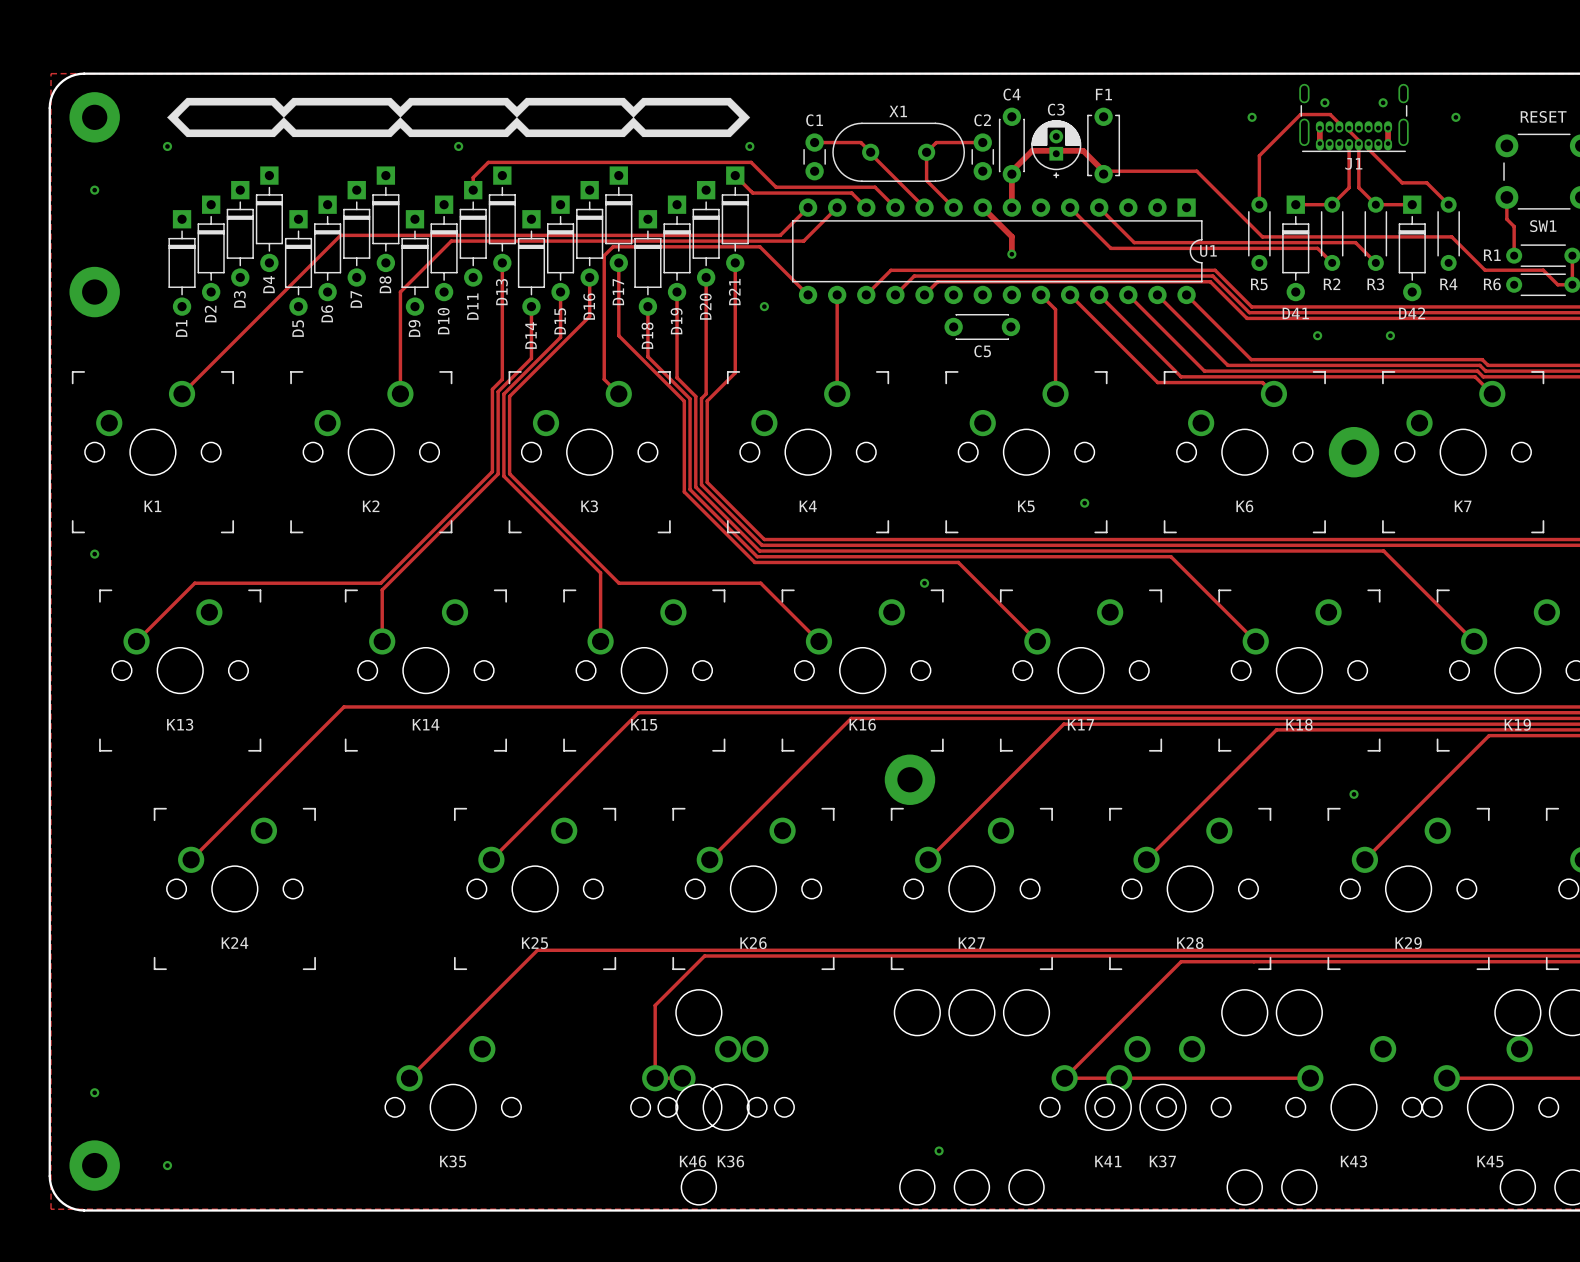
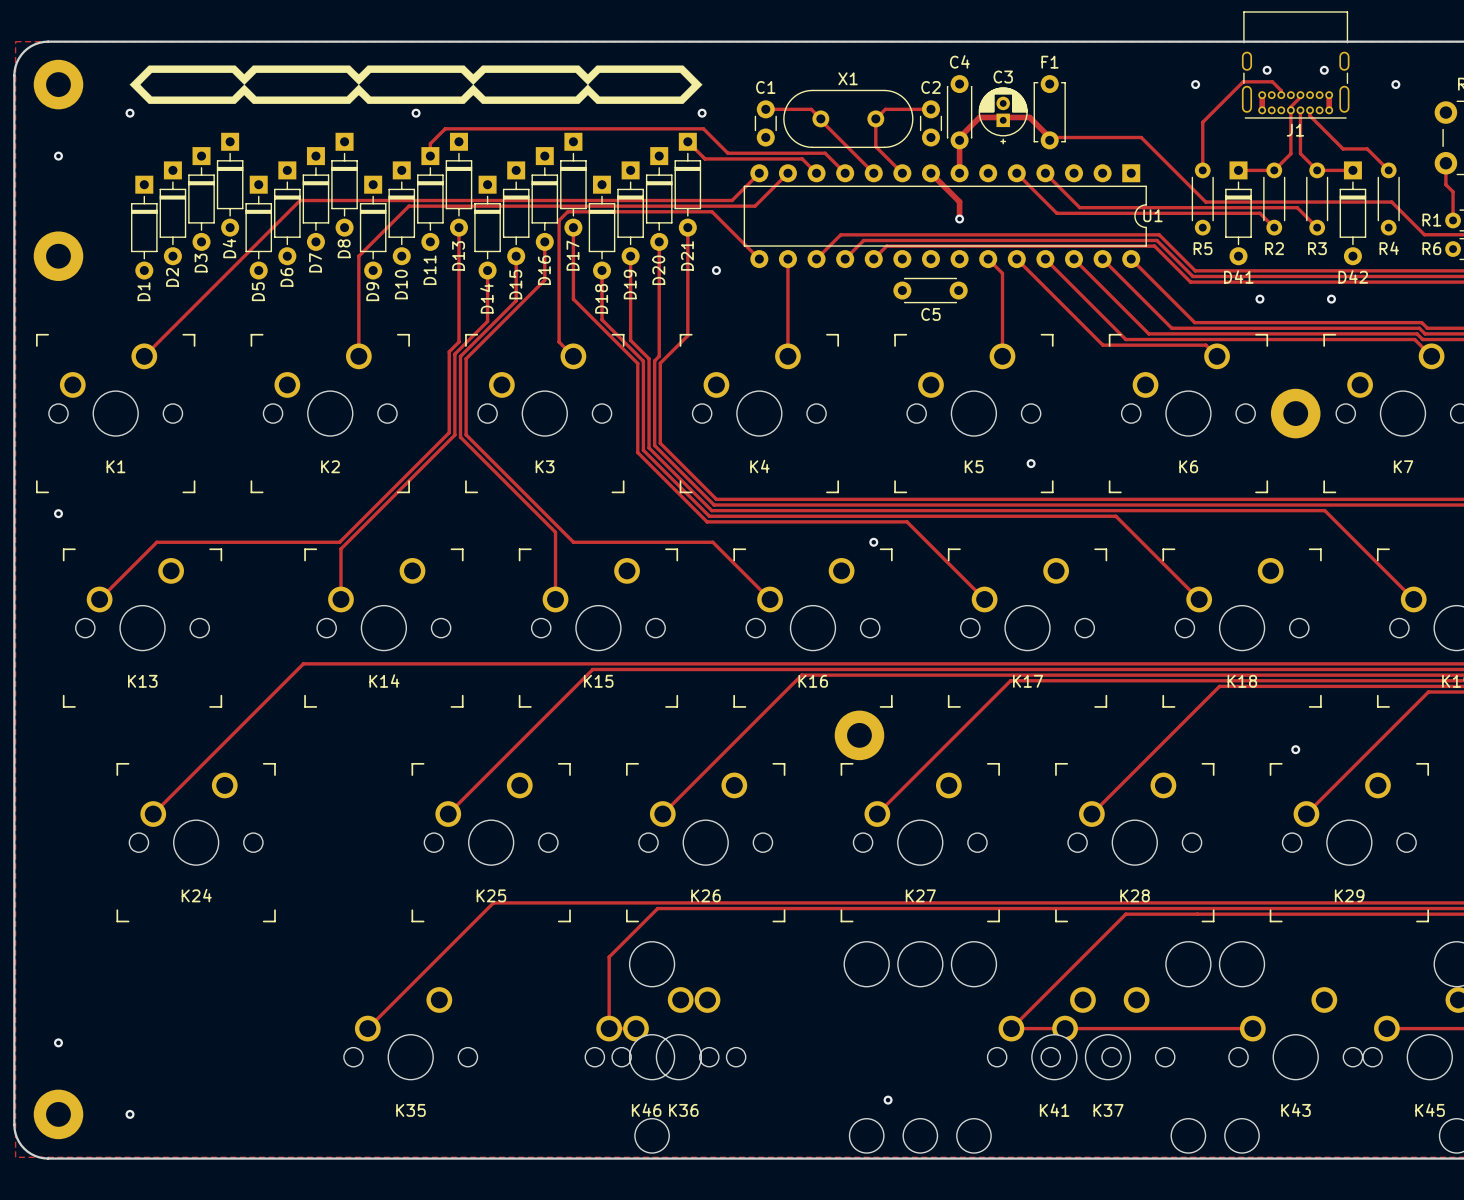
J1 footprint: [1299, 83, 1409, 153] -> [1241, 11, 1350, 119]
track: (1349, 128) (1349, 130) (1358, 140) (1358, 143) -> none
track: none -> (1300, 95) (1290, 106) (1290, 110)

